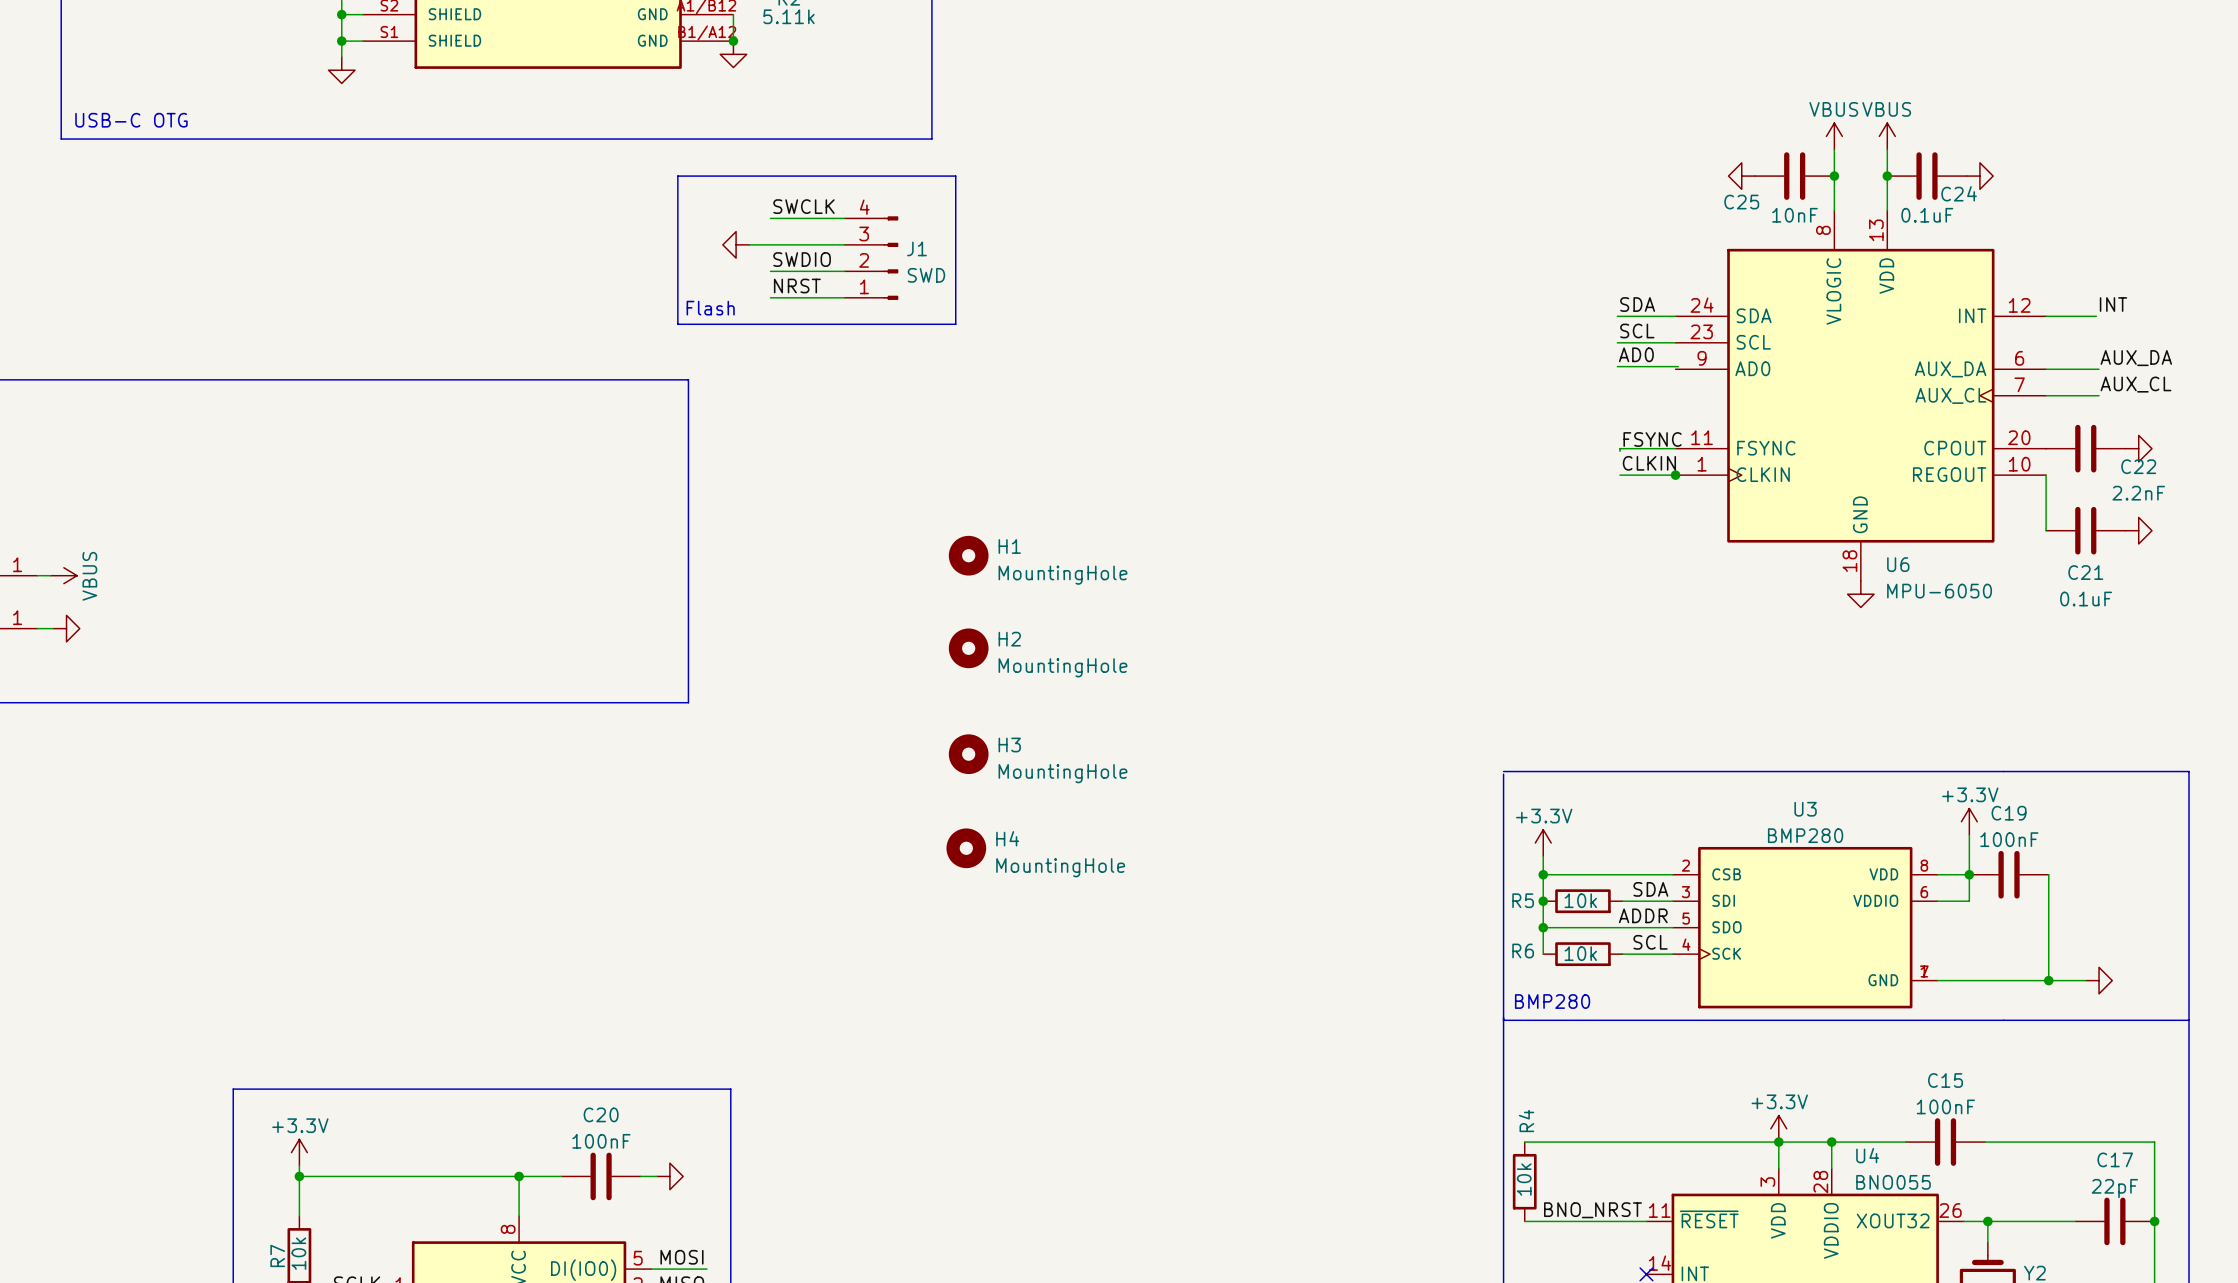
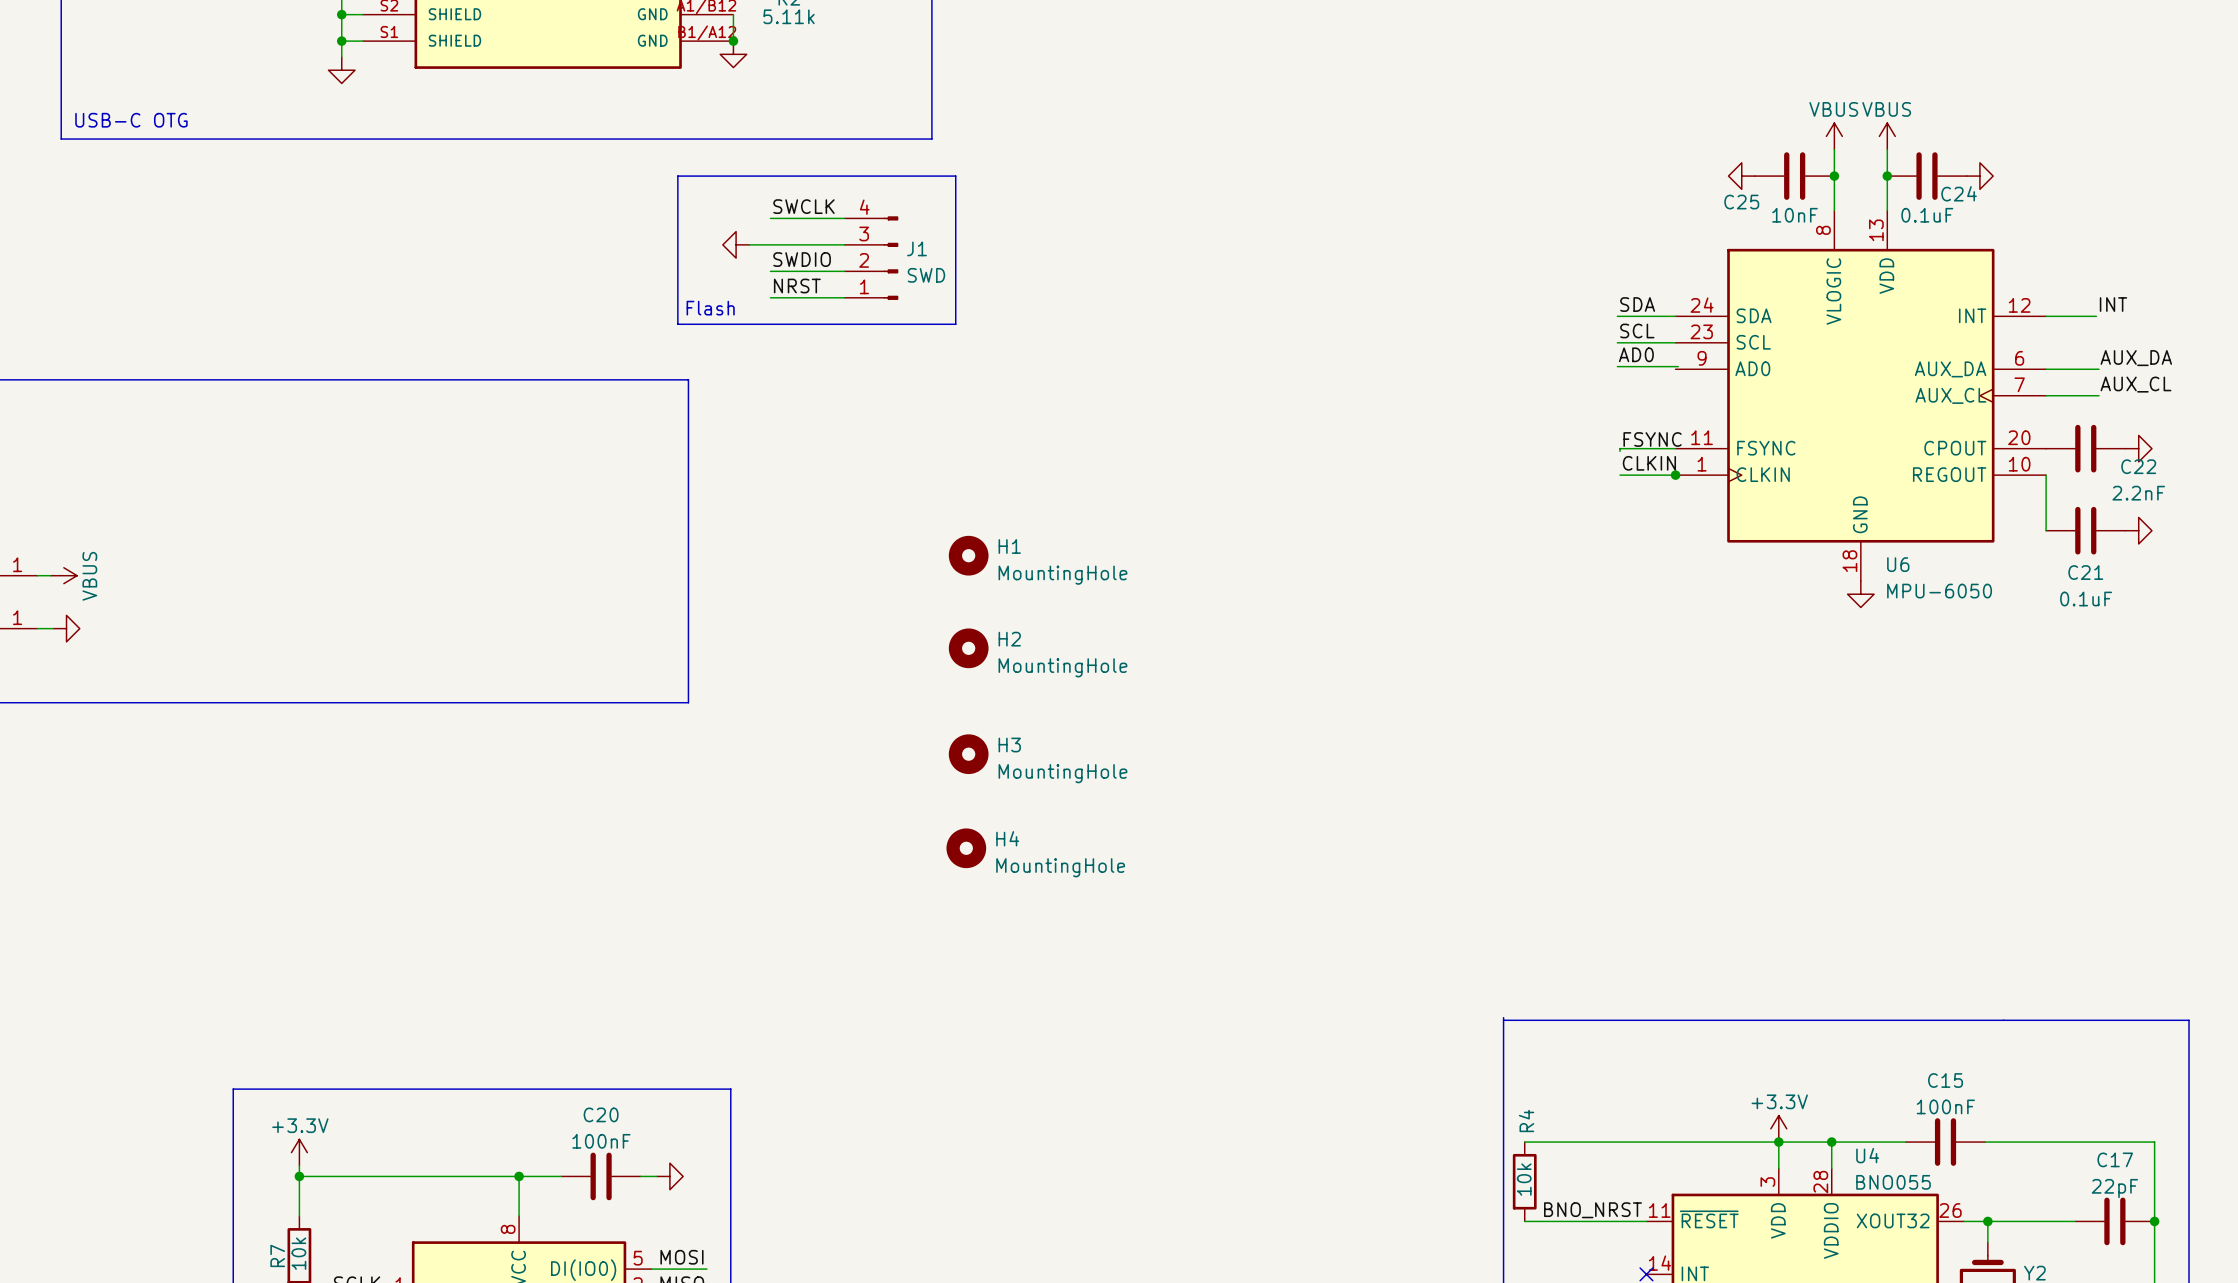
line: (1503, 771) (2189, 771) (2189, 1020) -> none
line: (1503, 774) (1503, 1017) -> none
power symbol: +3.3V (1969, 821) -> none
wire: (1969, 835) (1969, 901) (1937, 901) -> none
power symbol: +3.3V (1543, 842) -> none
wire: (1543, 856) (1543, 954) -> none
wire: (1543, 874) (1672, 874) -> none
junction: (1543, 874) -> none
wire: (1937, 874) (1969, 874) -> none
junction: (1969, 874) -> none
C19: 100nF (2009, 874) -> none
wire: (2048, 874) (2048, 980) -> none
label: SDA (1650, 889) -> none
junction: (1543, 901) -> none
R5: 10k (1582, 901) -> none
wire: (1622, 901) (1672, 901) -> none
label: ADDR (1643, 915) -> none
wire: (1543, 927) (1672, 927) -> none
junction: (1543, 927) -> none
U3: BMP280 (1805, 927) -> none
label: SCL (1650, 942) -> none
R6: 10k (1582, 954) -> none
wire: (1622, 954) (1672, 954) -> none
wire: (1937, 980) (2085, 980) -> none
junction: (2048, 980) -> none
power symbol: (2099, 980) -> none
text: BMP280 (1552, 1001) -> none

